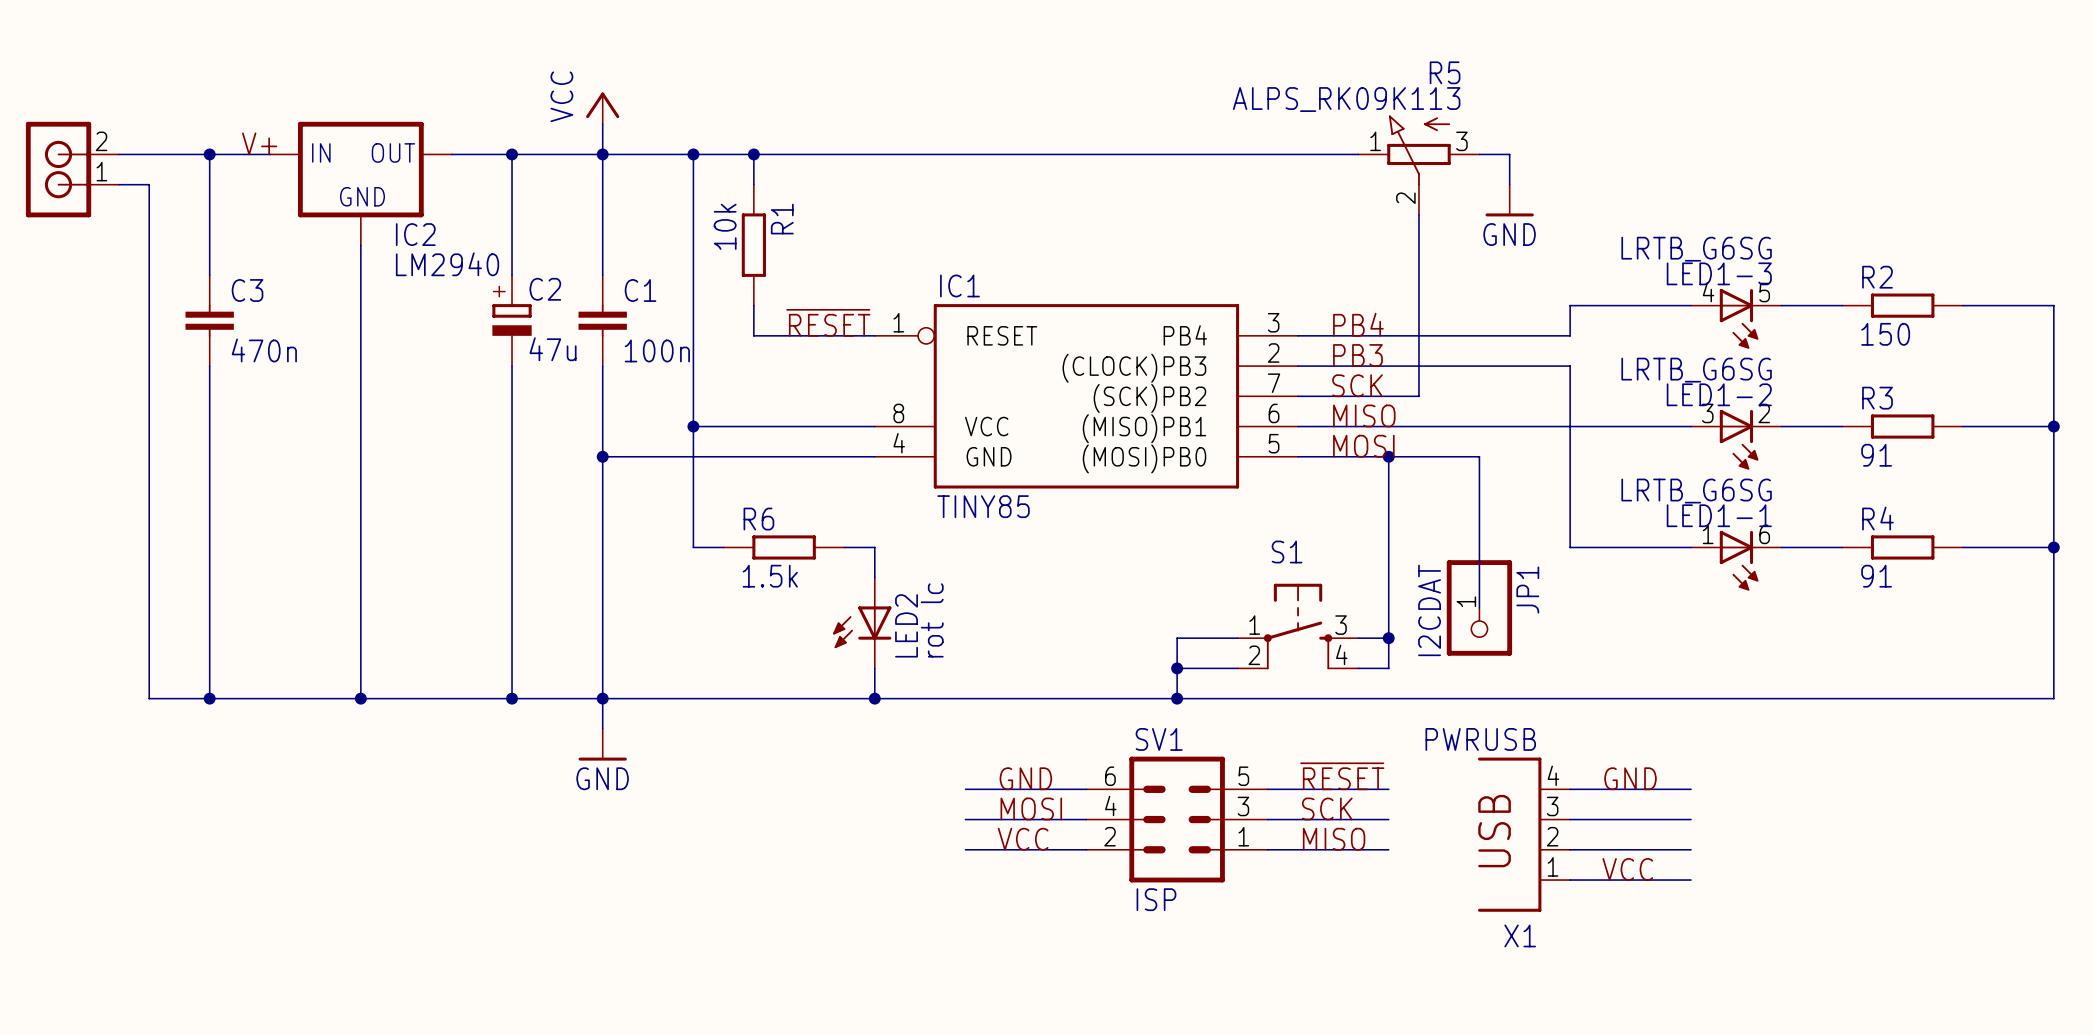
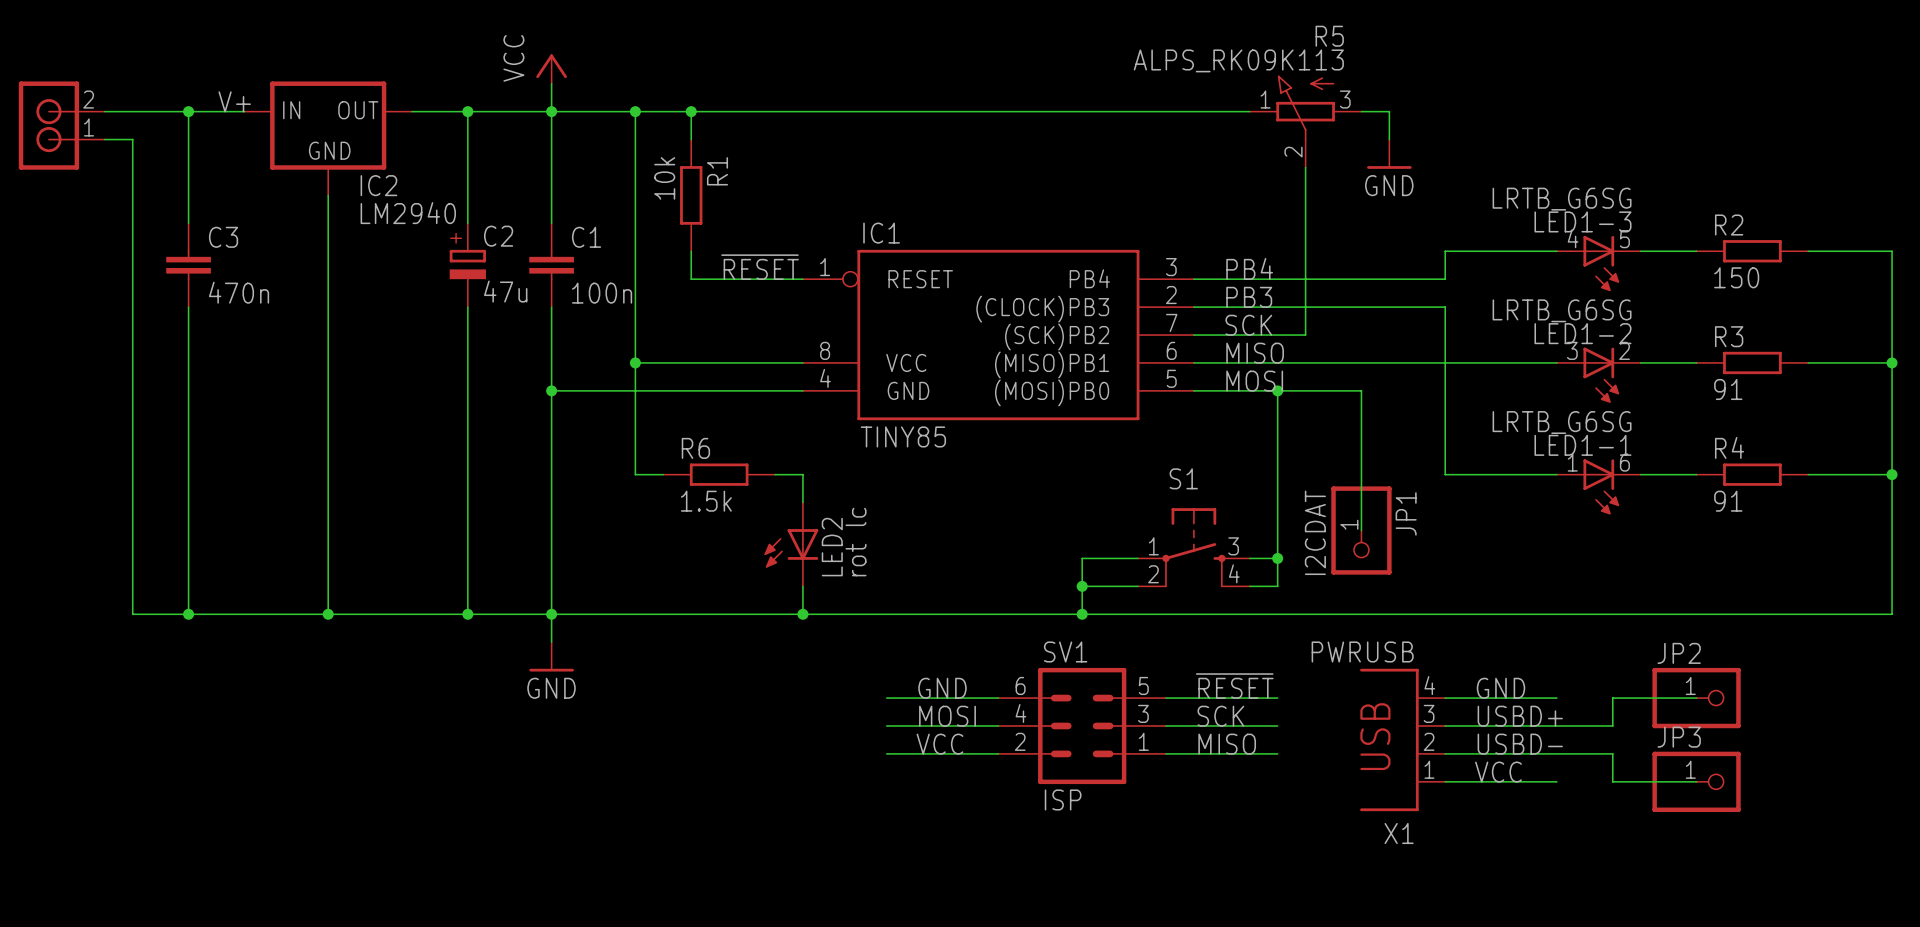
wire: none -> (1696, 698) (1612, 698) (1612, 725) (1556, 725)
JP2: none -> (1696, 698)
label: none -> USBD+ (1520, 716)
label: none -> USBD- (1520, 744)
wire: none -> (1556, 753) (1612, 753) (1612, 781) (1696, 781)
JP3: none -> (1696, 781)

